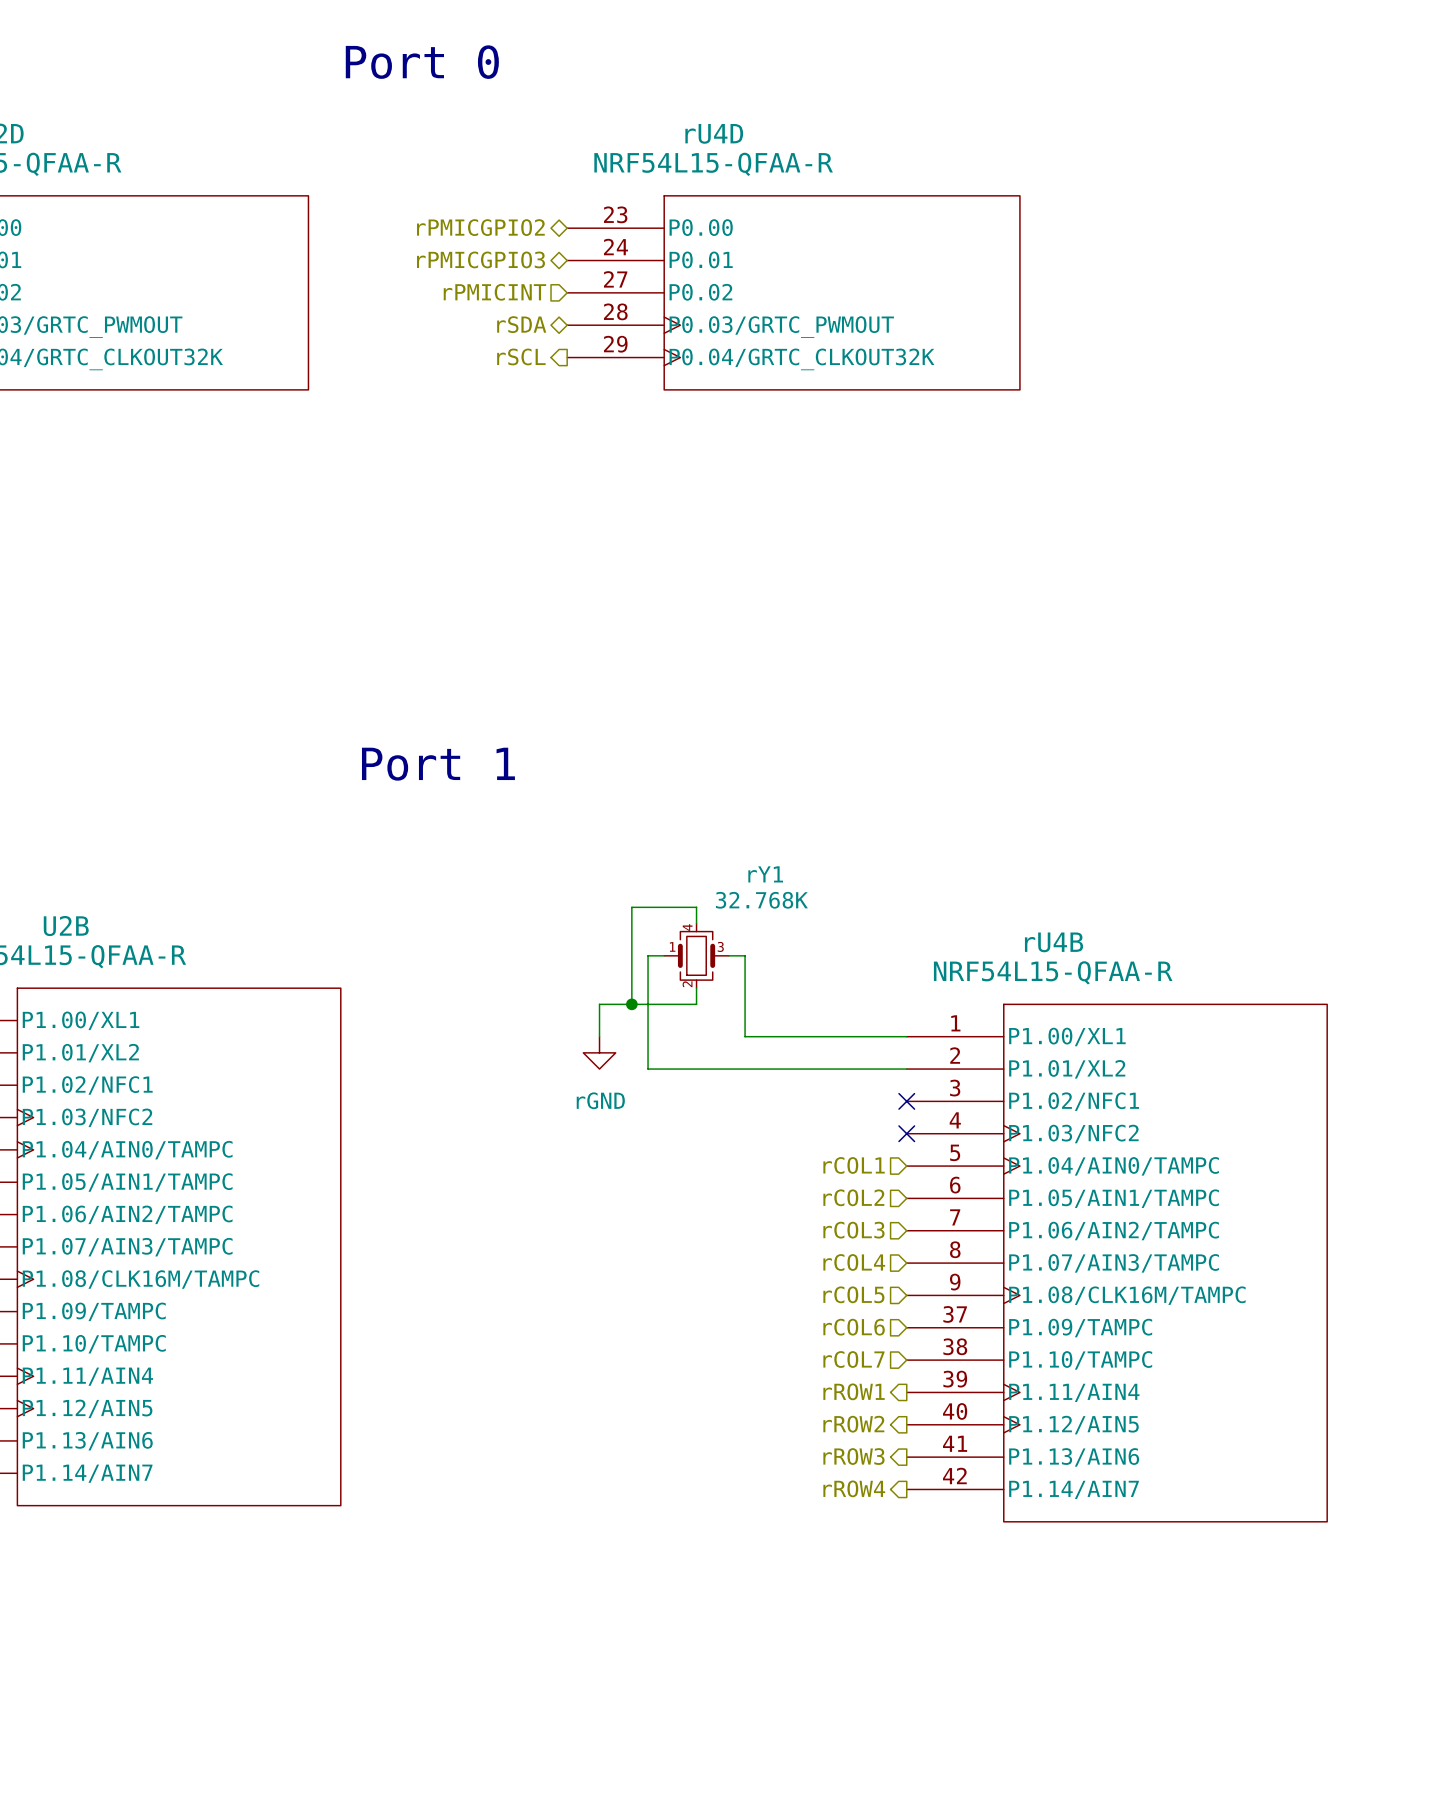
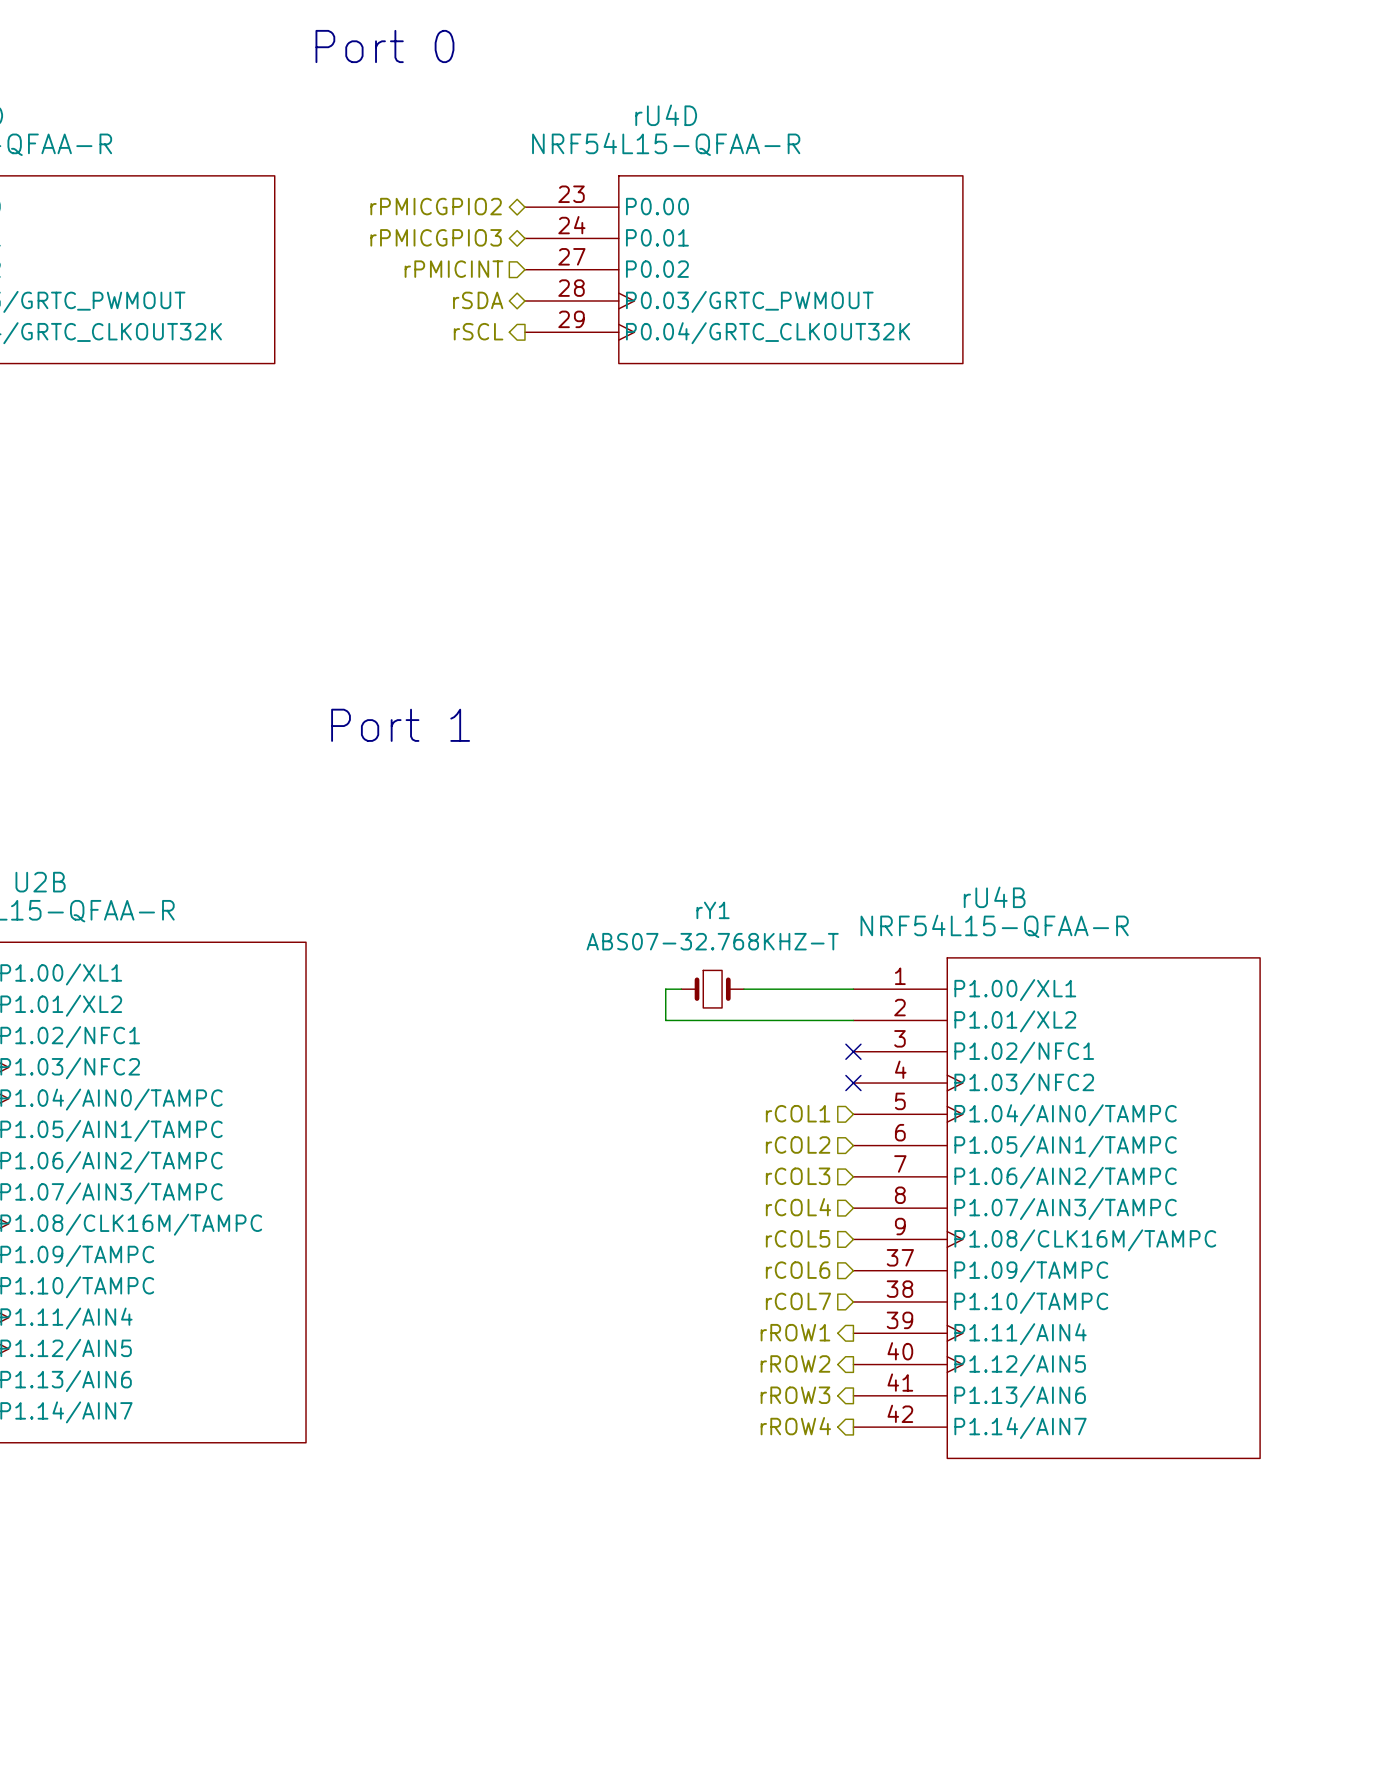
rY1 name position: rY1 (765, 874) -> rY1 (713, 910)
rY1 value: 32.768K (761, 900) -> ABS07-32.768KHZ-T (712, 941)
rY1 symbol: [664, 923, 729, 989] -> [681, 970, 744, 1008]
wire: (696, 923) (696, 907) (631, 907) (631, 1004) -> none
wire: (664, 955) (648, 955) (648, 1069) (712, 1069) -> (681, 989) (665, 989) (665, 1020)
wire: (728, 955) (745, 955) (745, 1036) (793, 1036) -> none
wire: (696, 988) (696, 1004) (599, 1004) (599, 1036) -> none
junction: (631, 1004) -> none
power symbol: rGND (599, 1052) -> none

